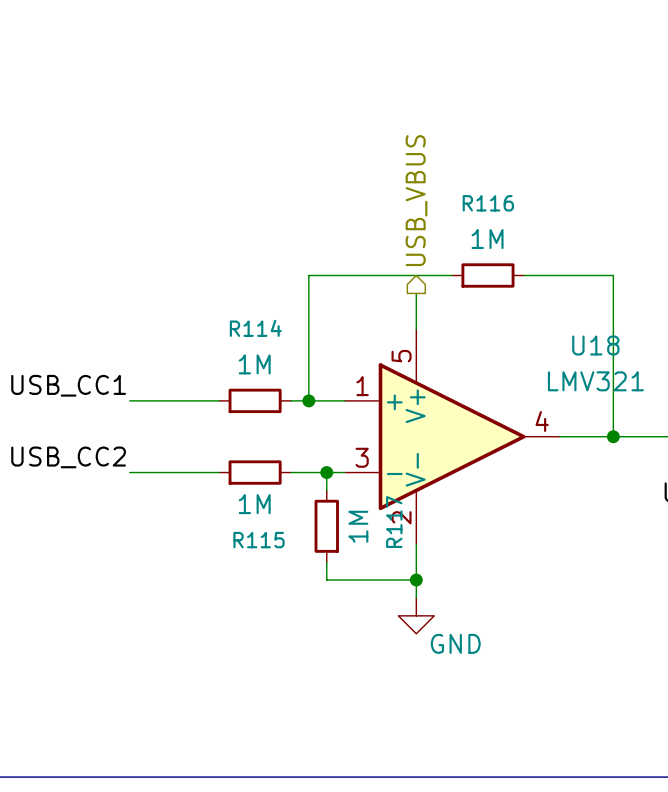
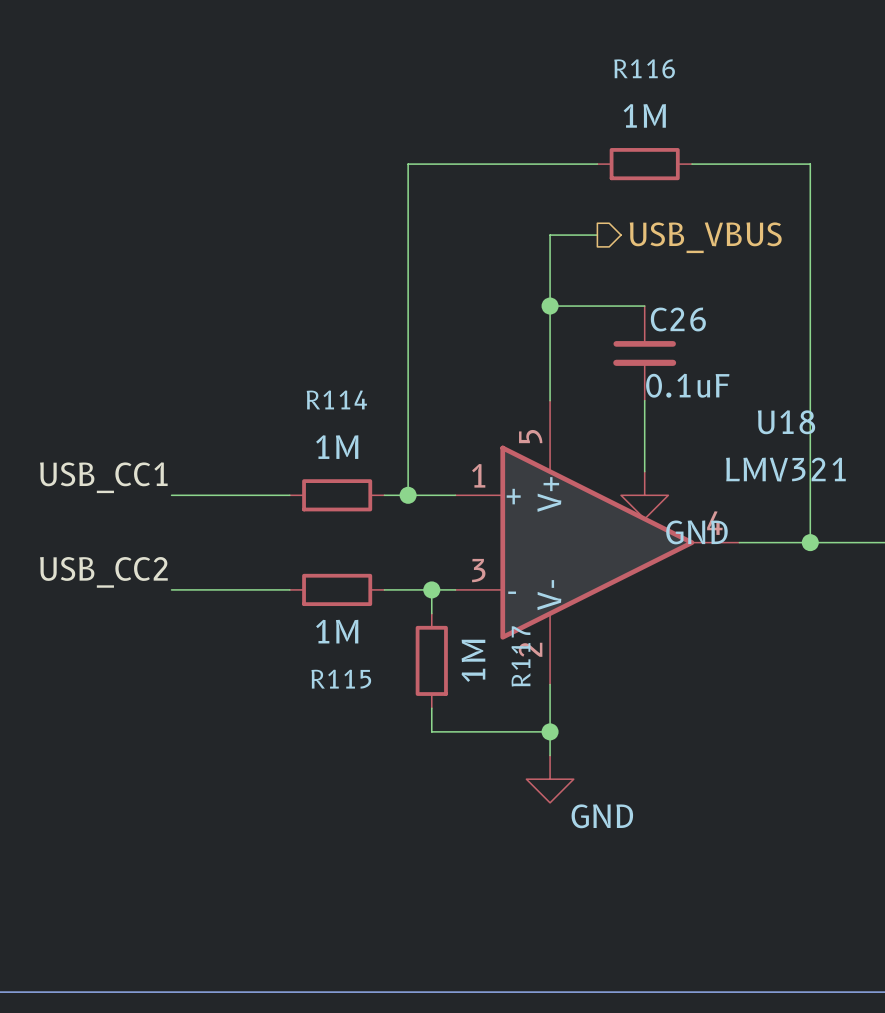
hierarchical label rotation: 0° (416, 200) -> 90° clockwise (705, 237)
wire: none -> (597, 235) (550, 235) (550, 353)
wire: none -> (550, 306) (644, 306)
junction: none -> (550, 306)
wire: (308, 275) (452, 275) -> (408, 329) (408, 164) (597, 164)
R116 position: (487, 275) -> (644, 164)
wire: (523, 275) (613, 275) -> (692, 164) (810, 164) (810, 329)
C26: none -> 0.1uF (644, 353)
wire: none -> (644, 400) (644, 471)
power symbol: none -> GND (644, 495)

